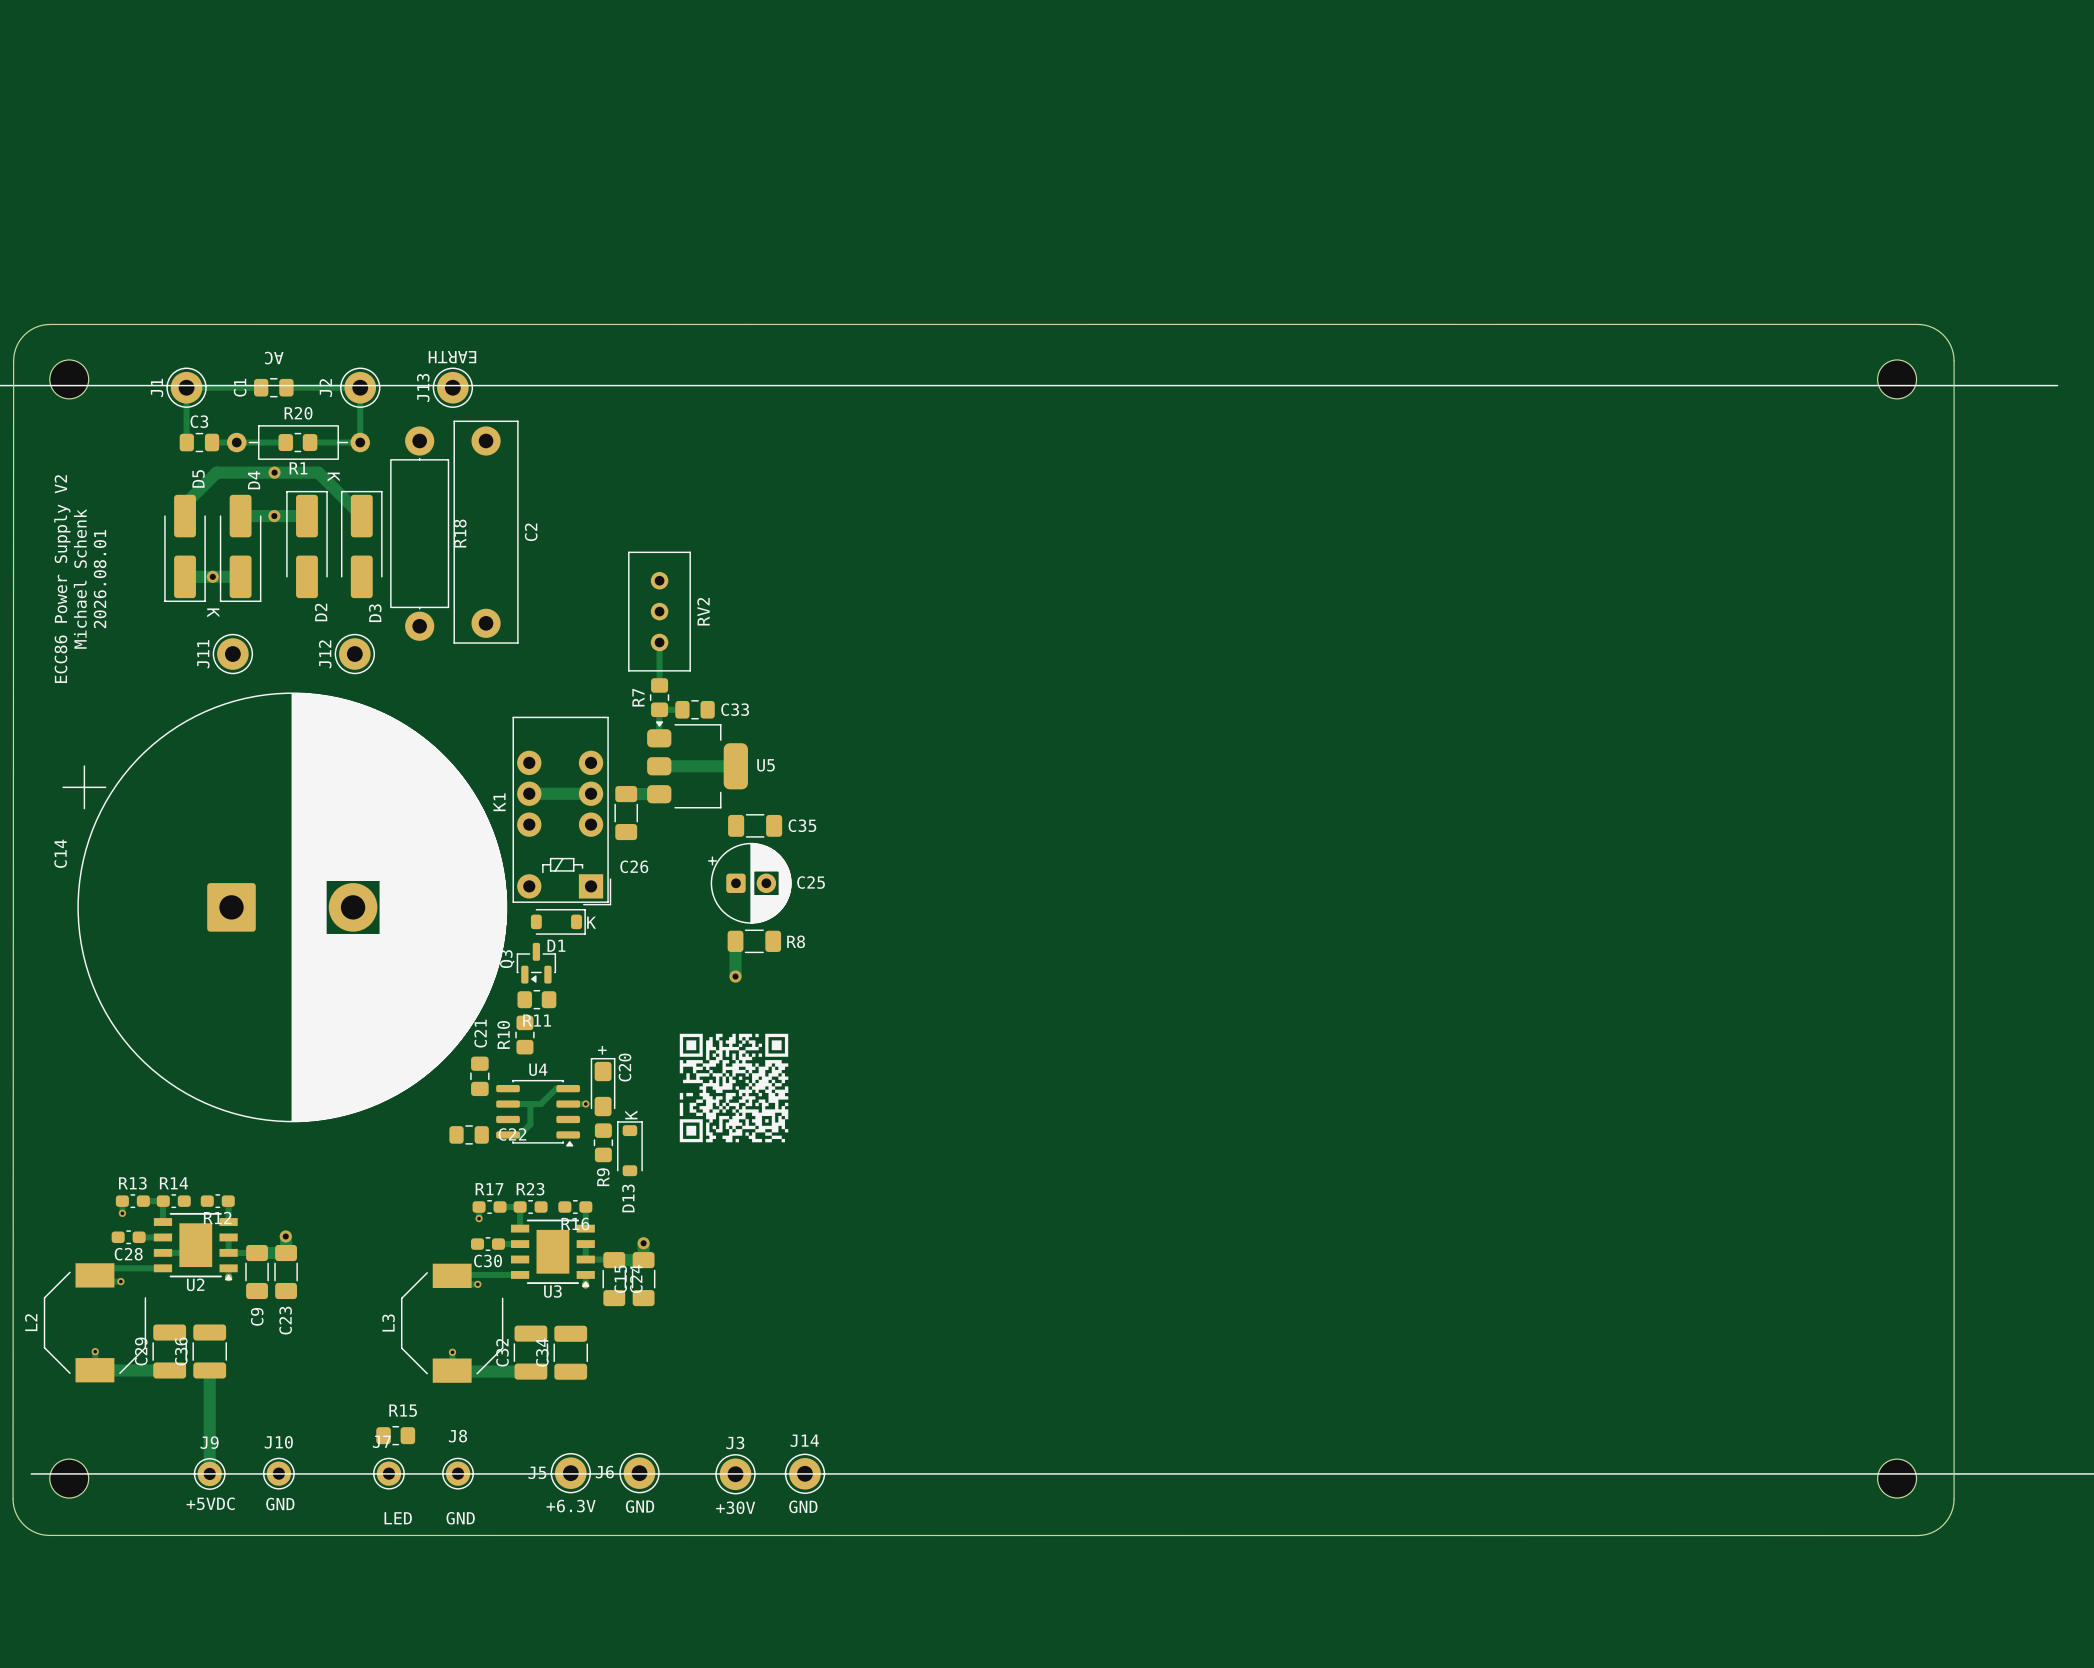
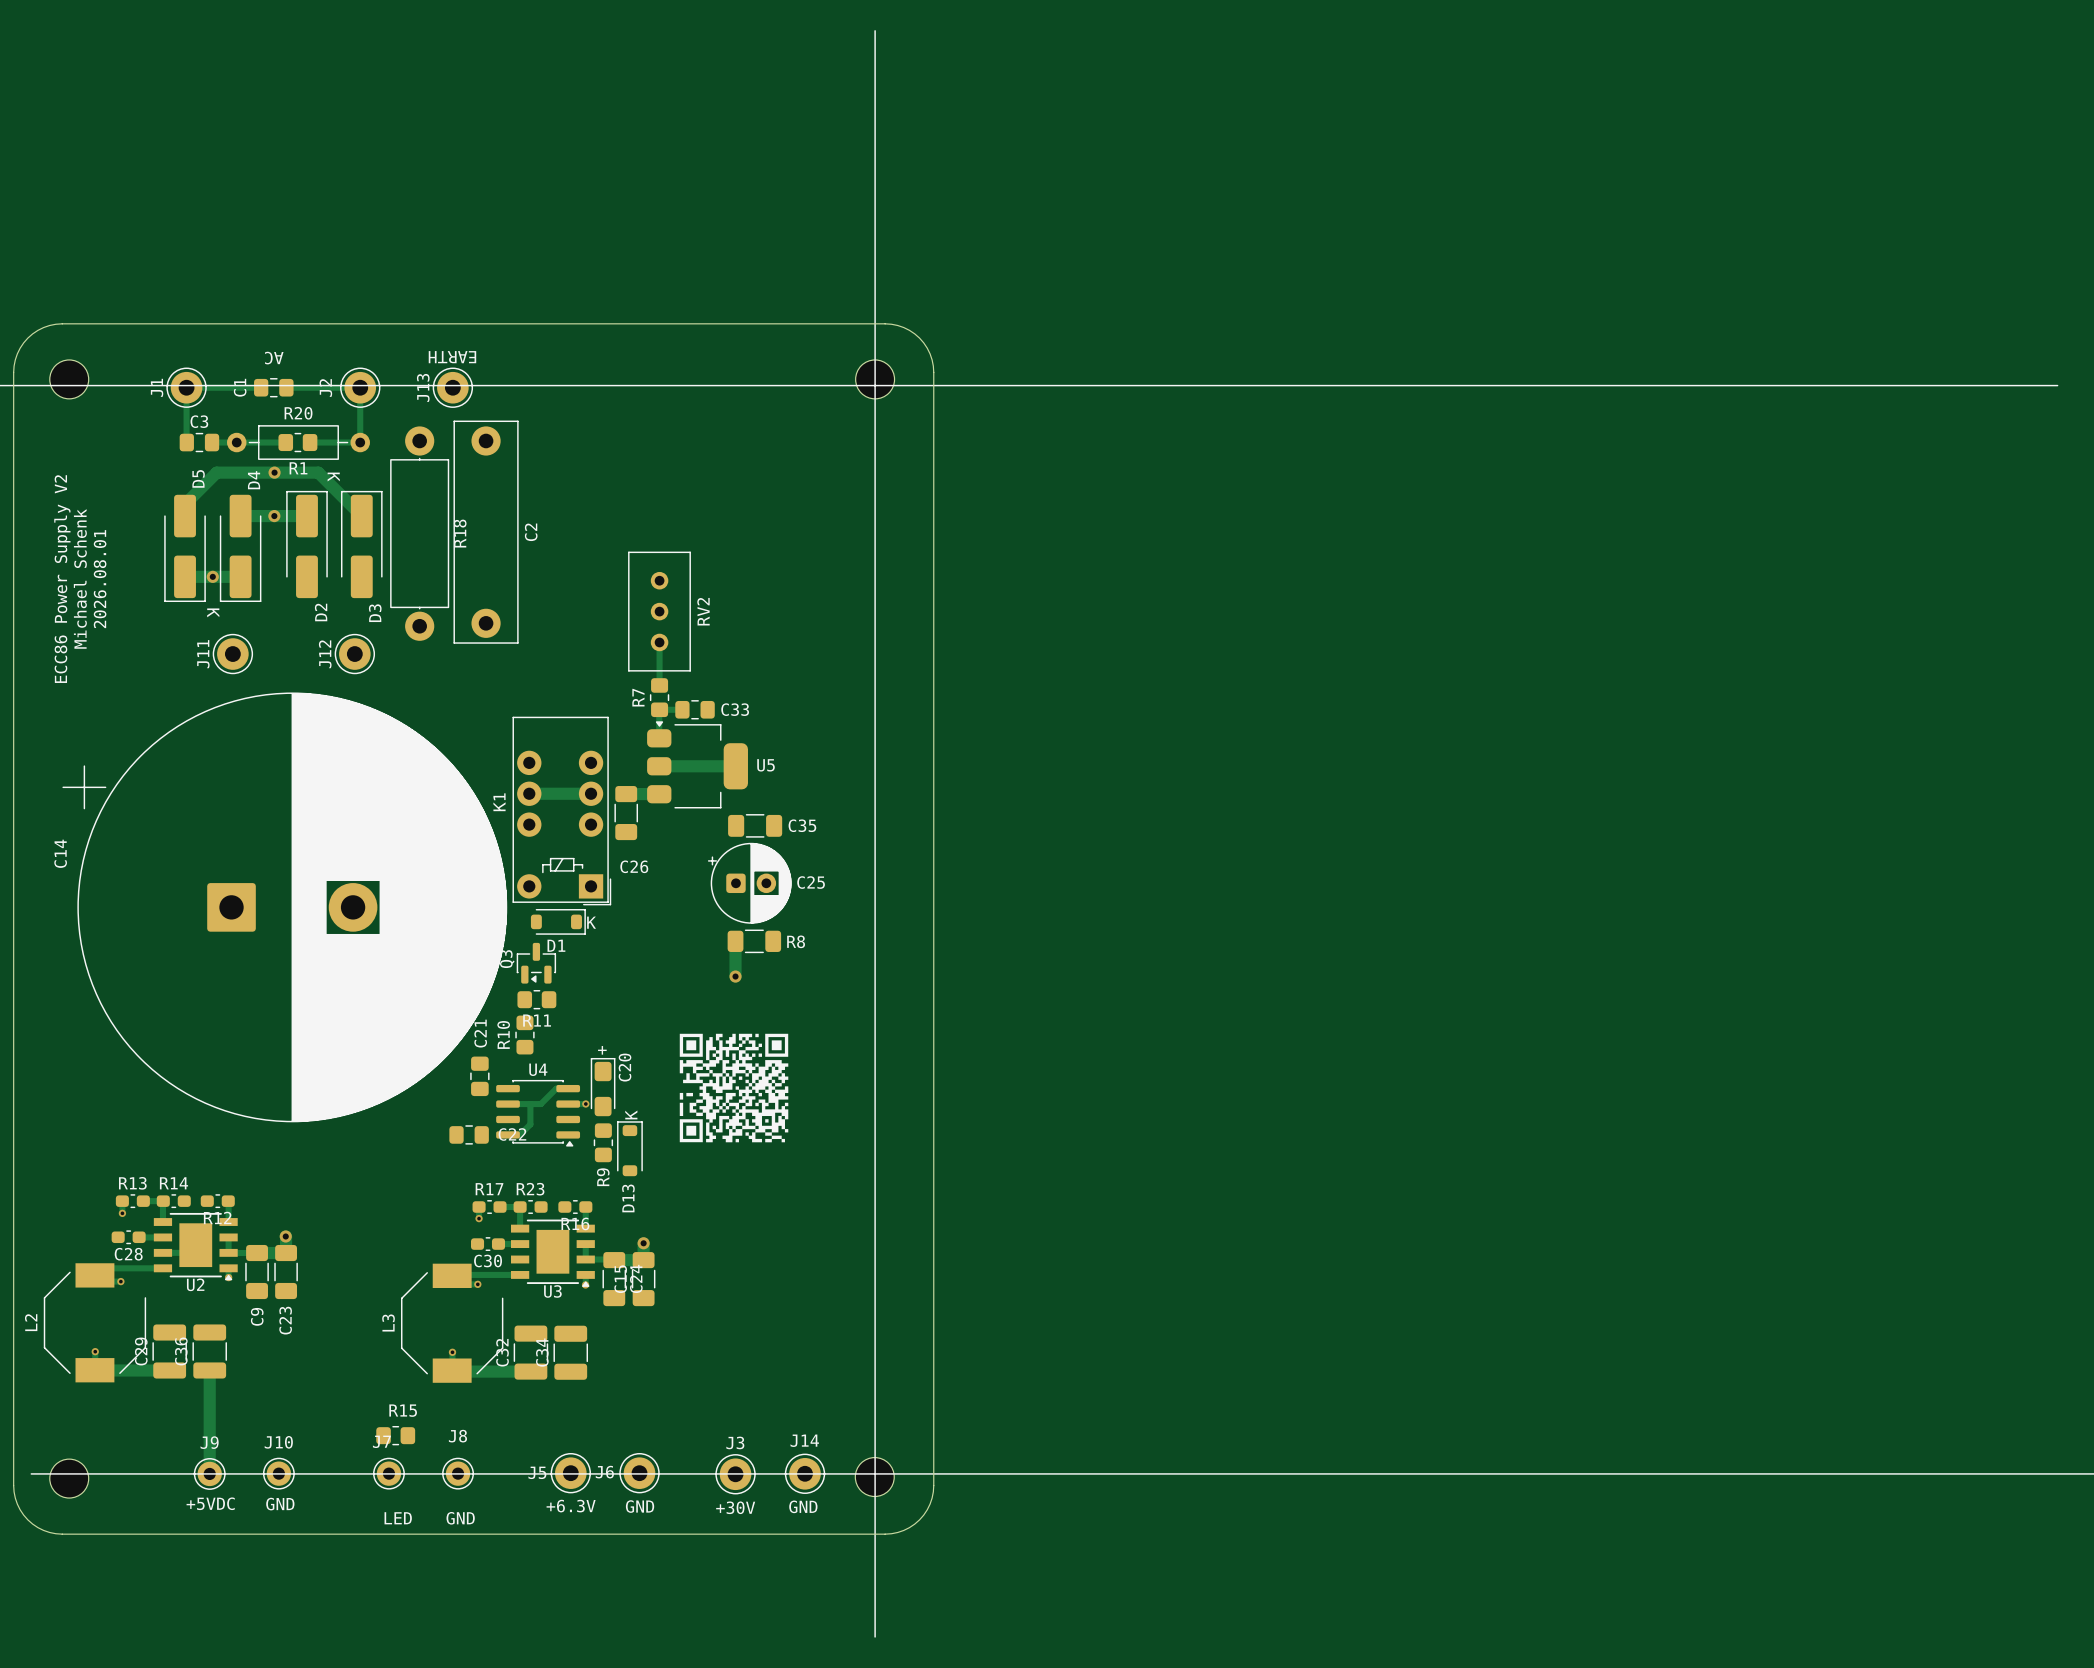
line: none -> (875, 30) (875, 1636)
board edge: none -> (62, 323) (885, 323) (897, 325) (909, 330) (923, 342) (932, 359) (933, 372) (933, 1485) (932, 1498) (927, 1509) (914, 1524) (897, 1532) (885, 1534) (62, 1534) (43, 1530) (32, 1524) (23, 1515) (17, 1504) (13, 1485) (13, 372) (17, 353) (27, 338) (43, 327) (62, 323)
board edge: (50, 324) (1917, 324) (1937, 330) (1950, 345) (1954, 360) (1954, 1499) (1949, 1517) (1935, 1530) (1917, 1535) (49, 1535) (30, 1529) (18, 1518) (13, 1498) (13, 360) (15, 348) (24, 335) (34, 328) (50, 324) -> none
part: none -> (875, 379)
part: (1897, 379) -> none
part: none -> (874, 1477)
part: (1897, 1478) -> none

